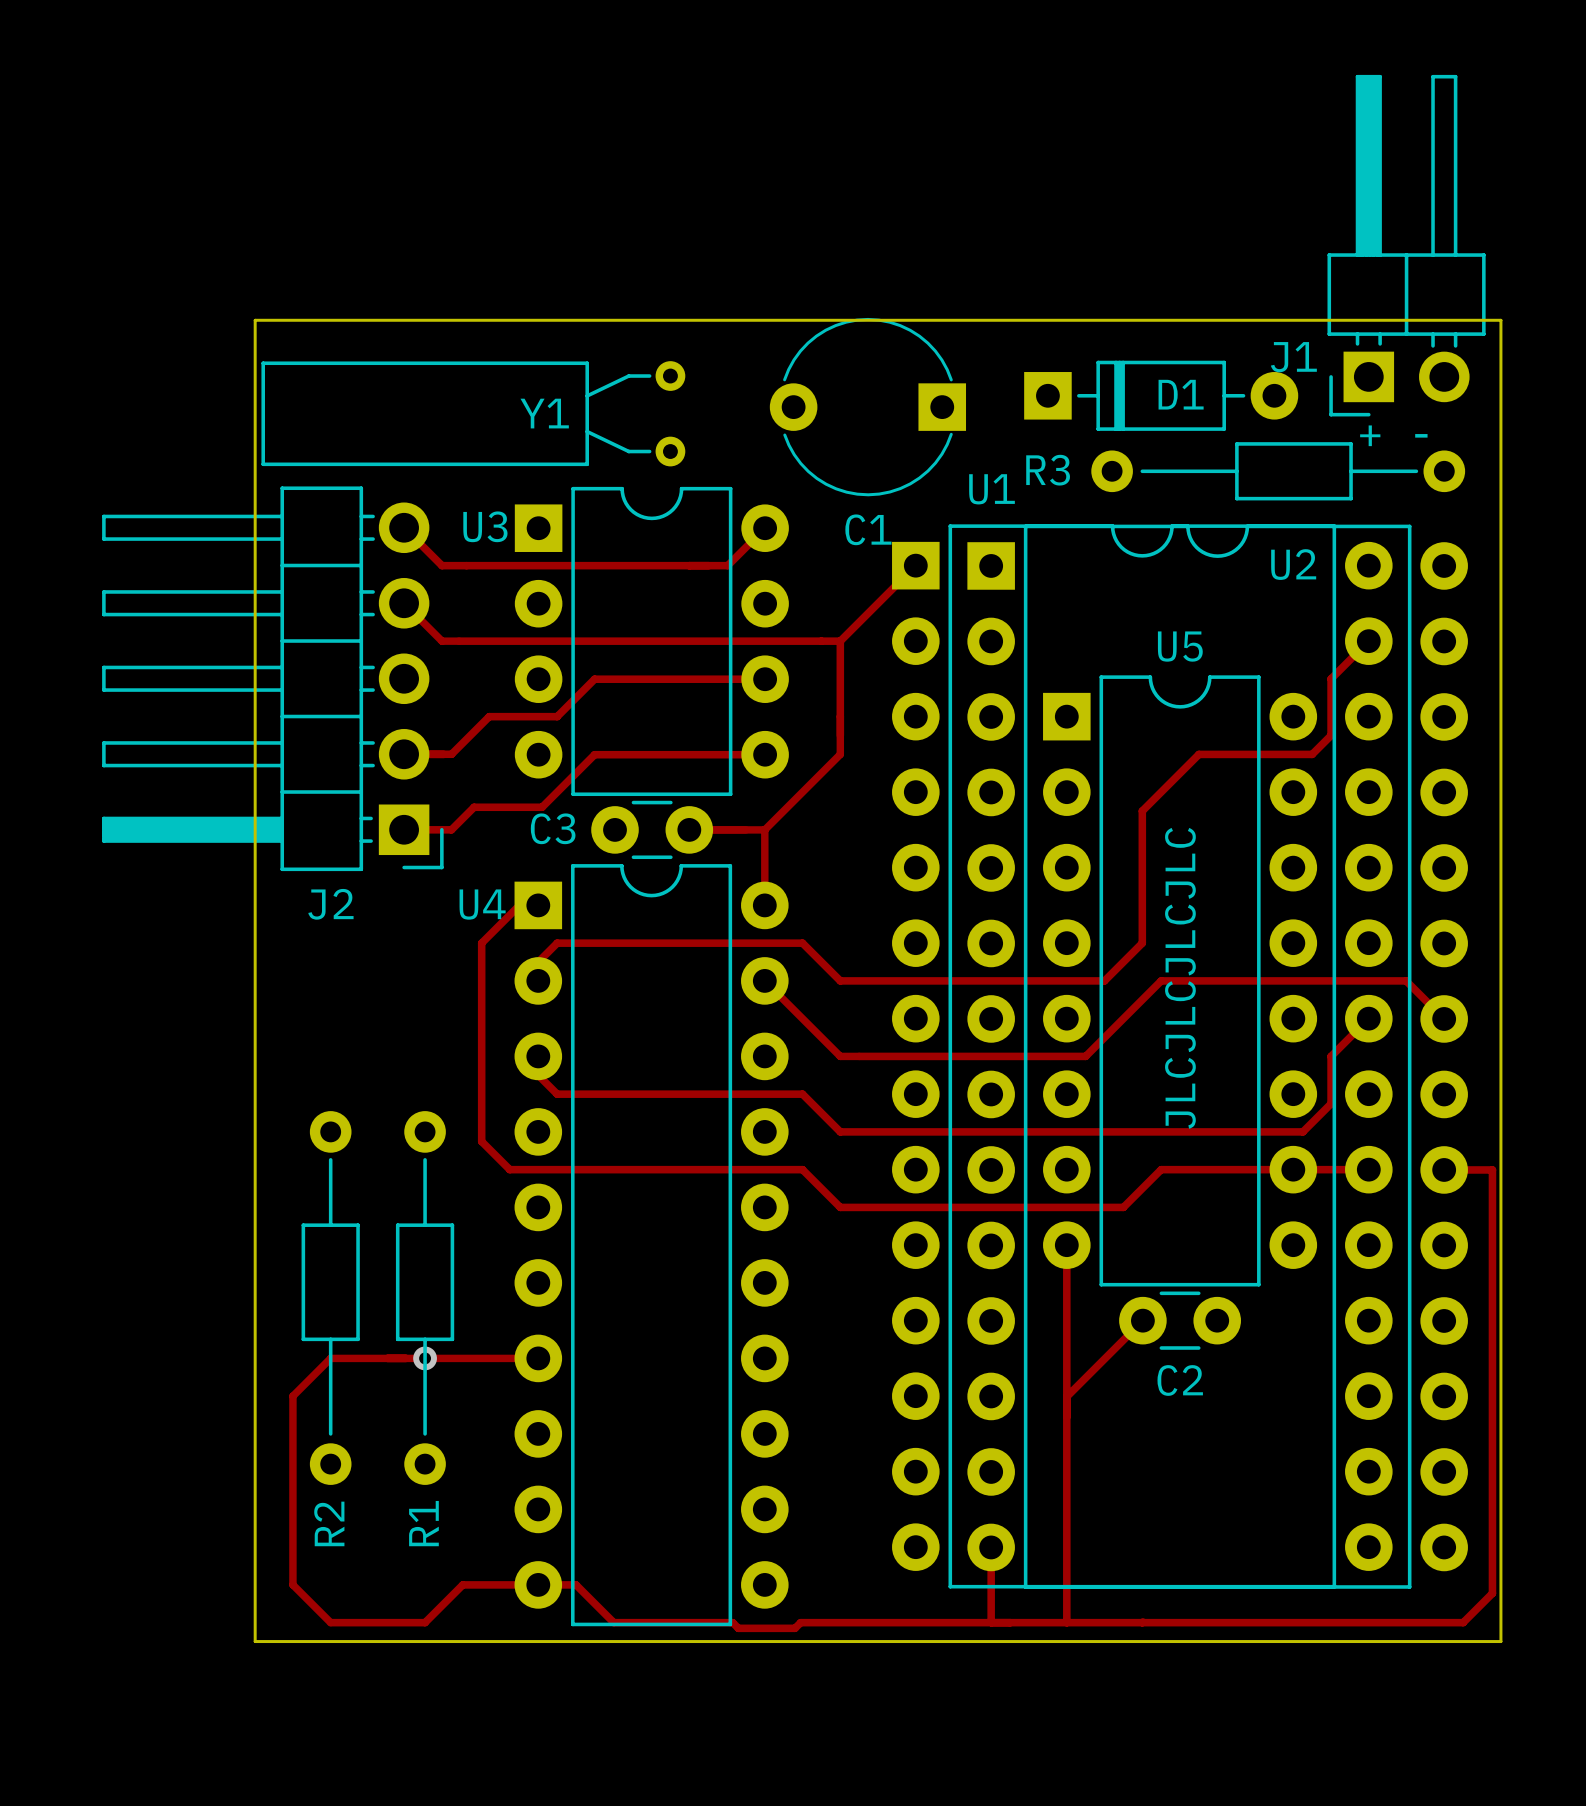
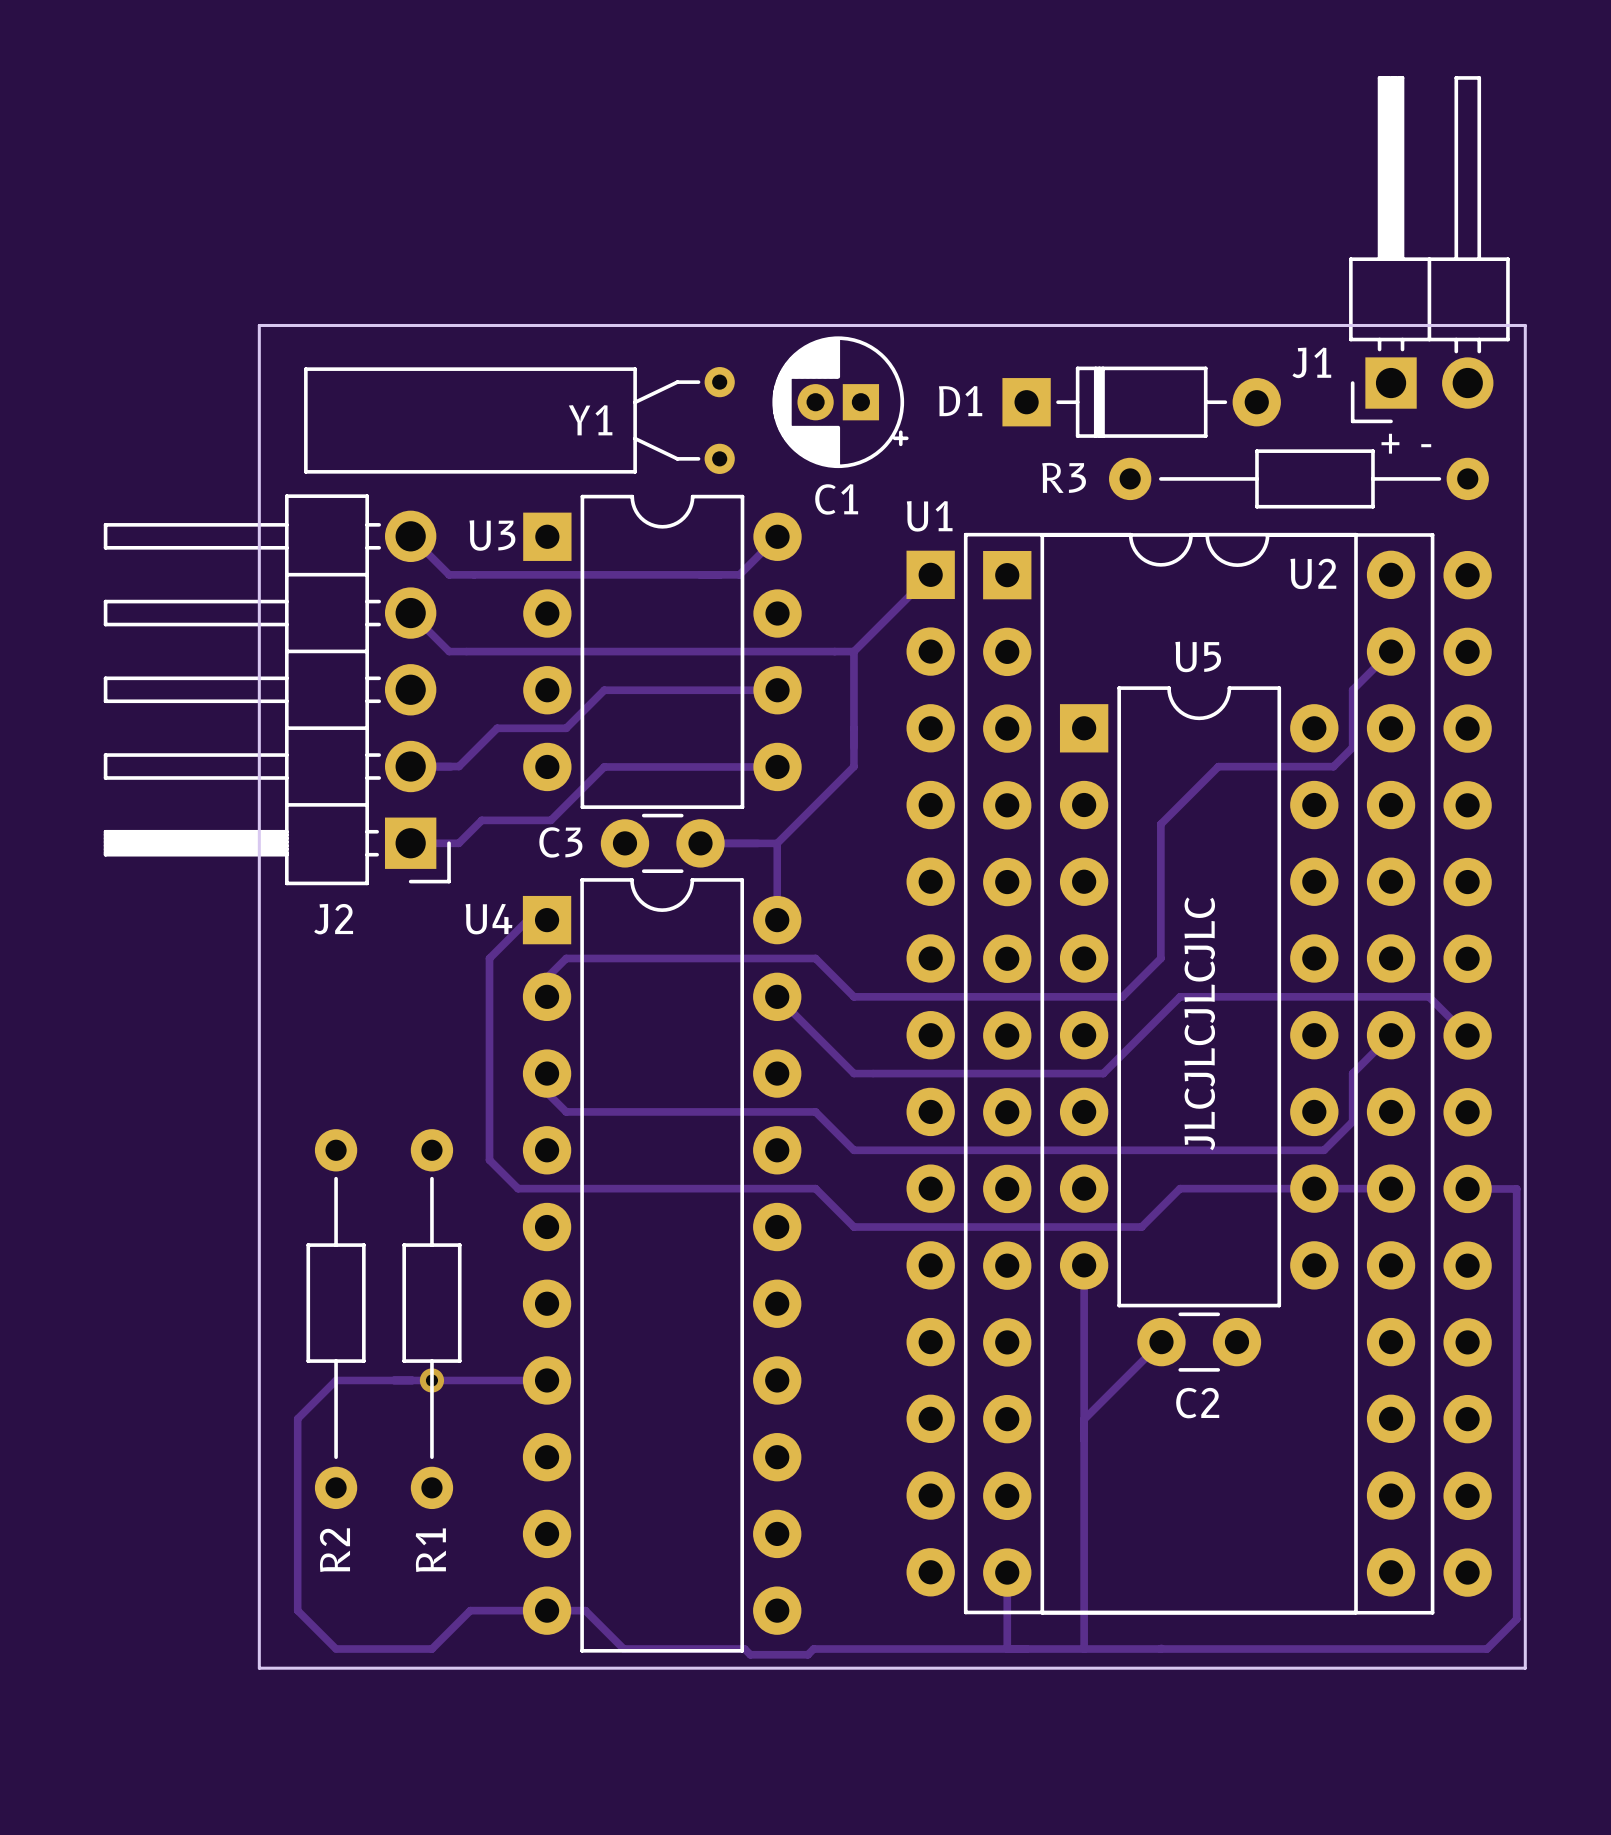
C1 footprint: [769, 317, 967, 497] -> [772, 336, 909, 469]
D1 name position: D1 (1181, 394) -> D1 (960, 401)
D1 position: (1161, 395) -> (1141, 402)
Y1 position: (473, 413) -> (519, 420)
U1 name position: U1 (992, 489) -> U1 (929, 516)

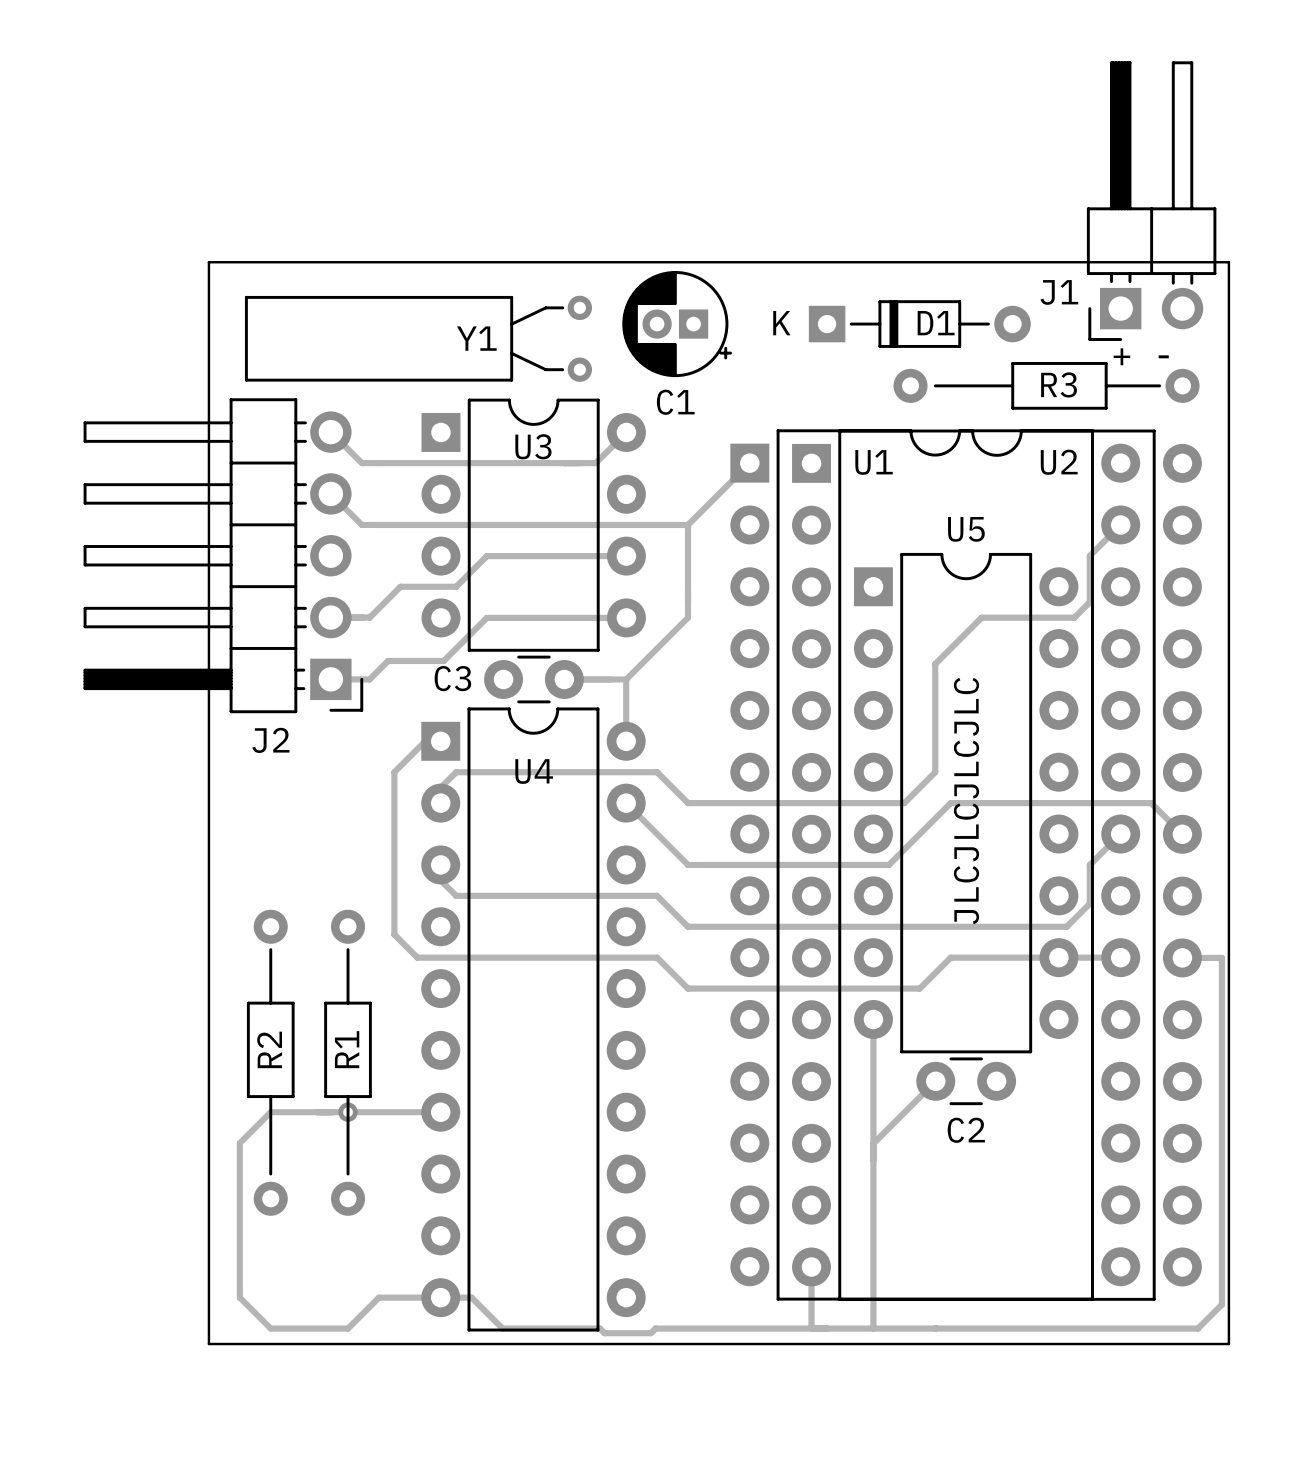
D1 footprint: [1002, 366, 1281, 438] -> [808, 300, 1031, 348]
D1 name position: D1 (960, 401) -> D1 (936, 323)
R3 name position: R3 (1064, 477) -> R3 (1059, 384)
U1 name position: U1 (929, 516) -> U1 (874, 462)
U3 name position: U3 (492, 535) -> U3 (533, 446)
U4 name position: U4 (489, 919) -> U4 (534, 771)
R2 name position: R2 (334, 1550) -> R2 (269, 1049)
R1 name position: R1 (430, 1550) -> R1 (347, 1049)

